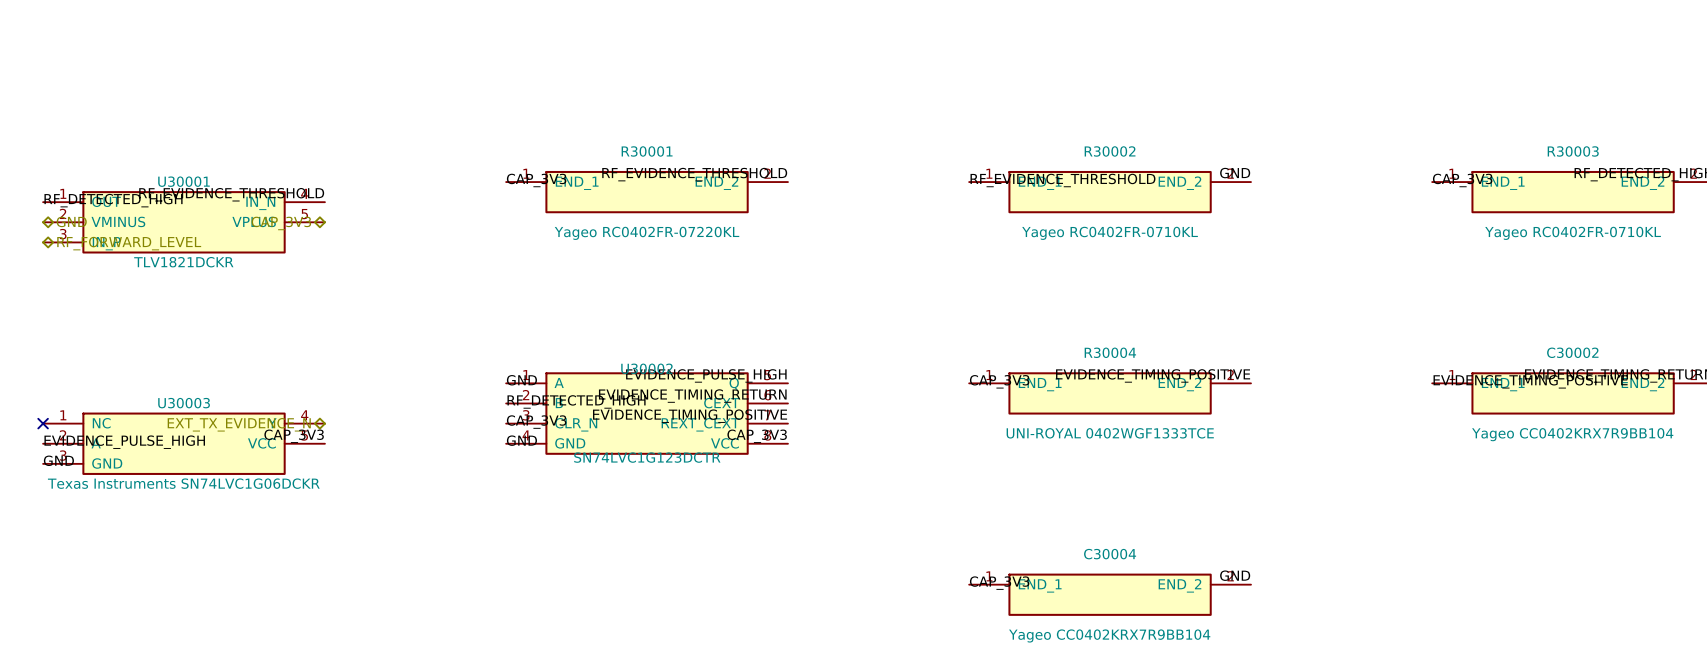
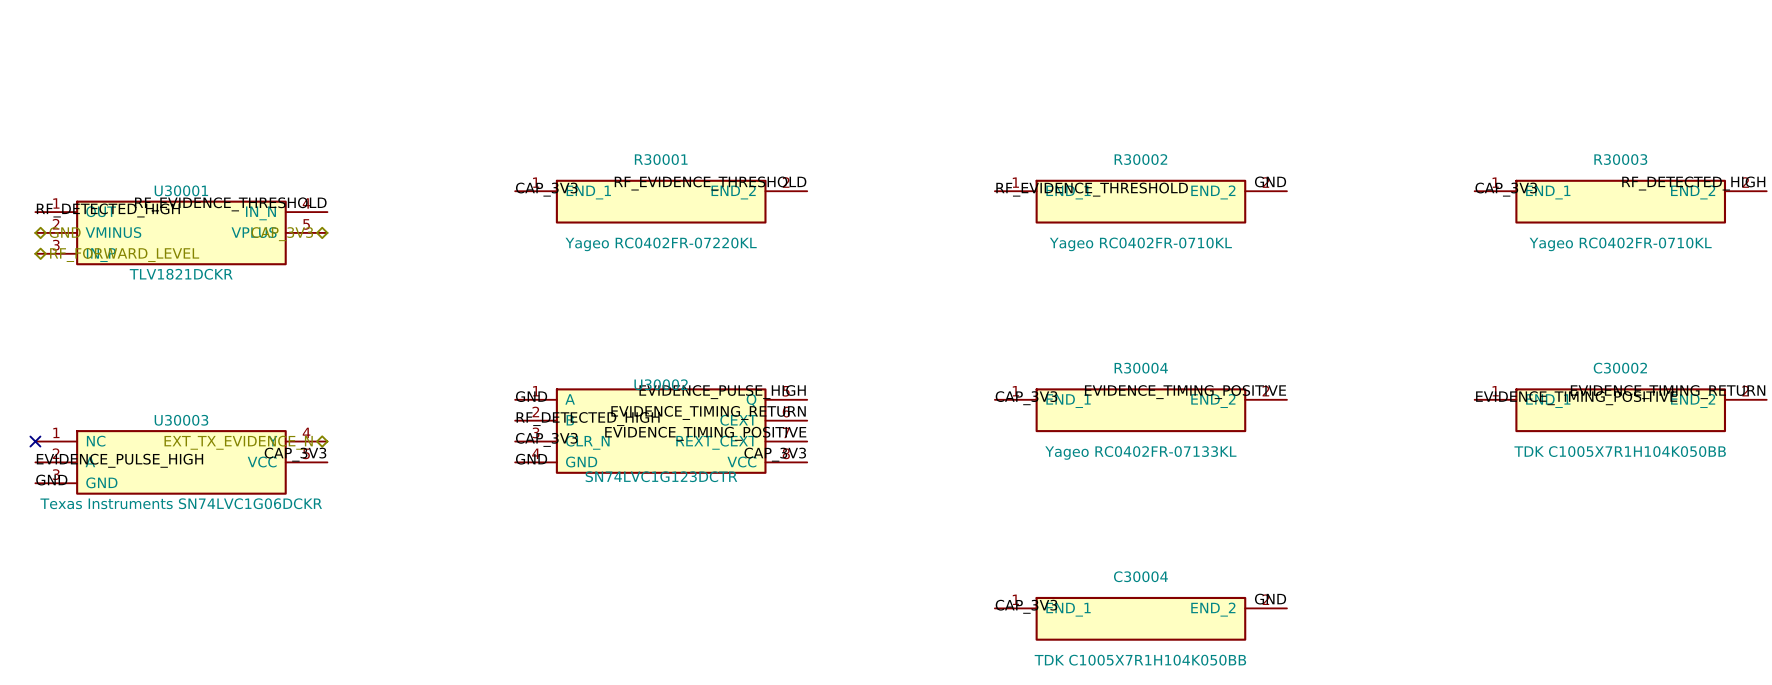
R30004 value: UNI-ROYAL 0402WGF1333TCE (1110, 433) -> Yageo RC0402FR-07133KL (1140, 452)
C30002 value: Yageo CC0402KRX7R9BB104 (1572, 434) -> TDK C1005X7R1H104K050BB (1620, 451)
C30004 value: Yageo CC0402KRX7R9BB104 (1109, 635) -> TDK C1005X7R1H104K050BB (1140, 660)

